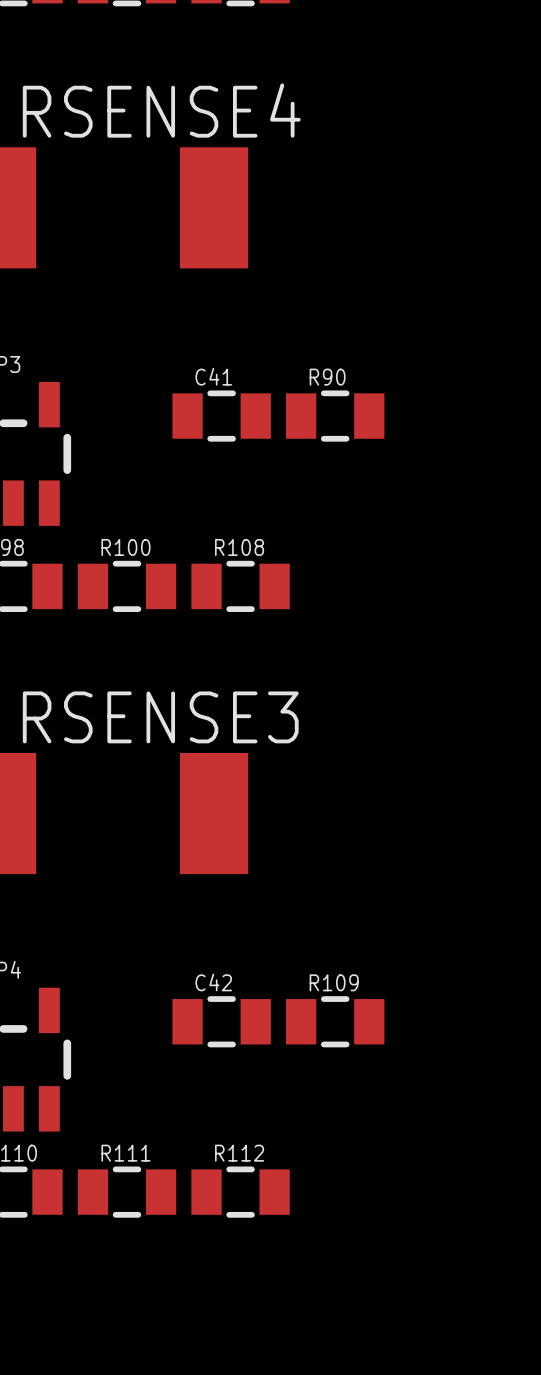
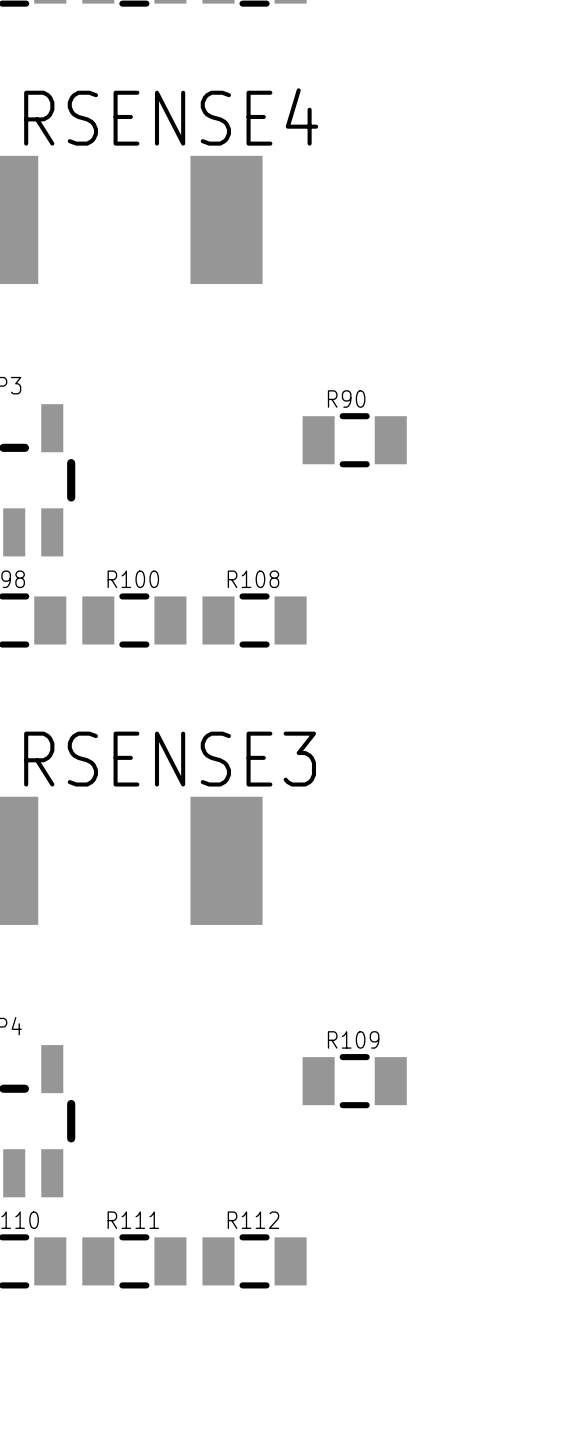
C41: (221, 416) -> none
C42: (221, 1021) -> none

